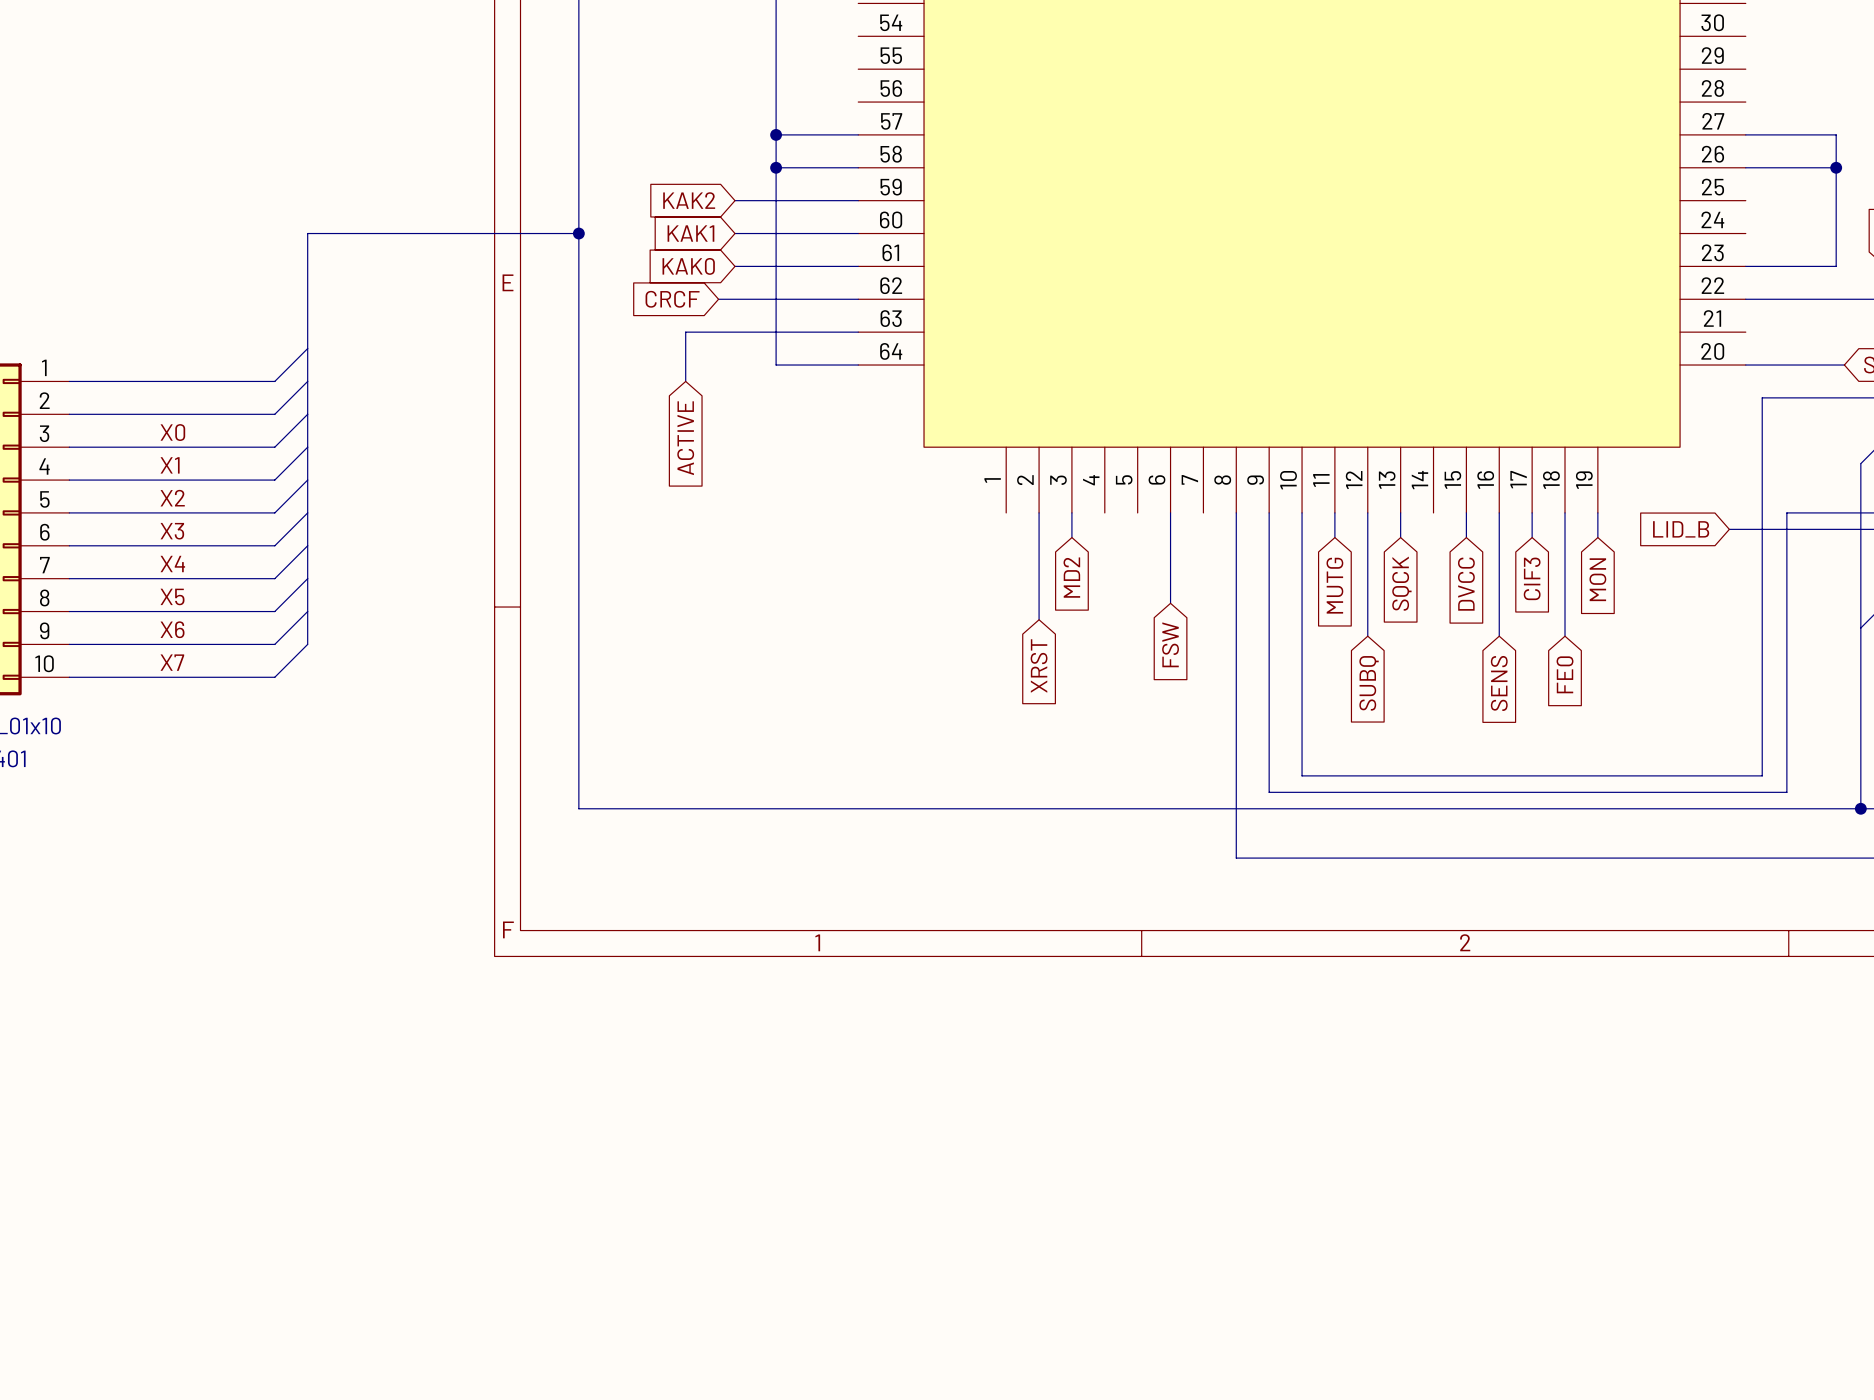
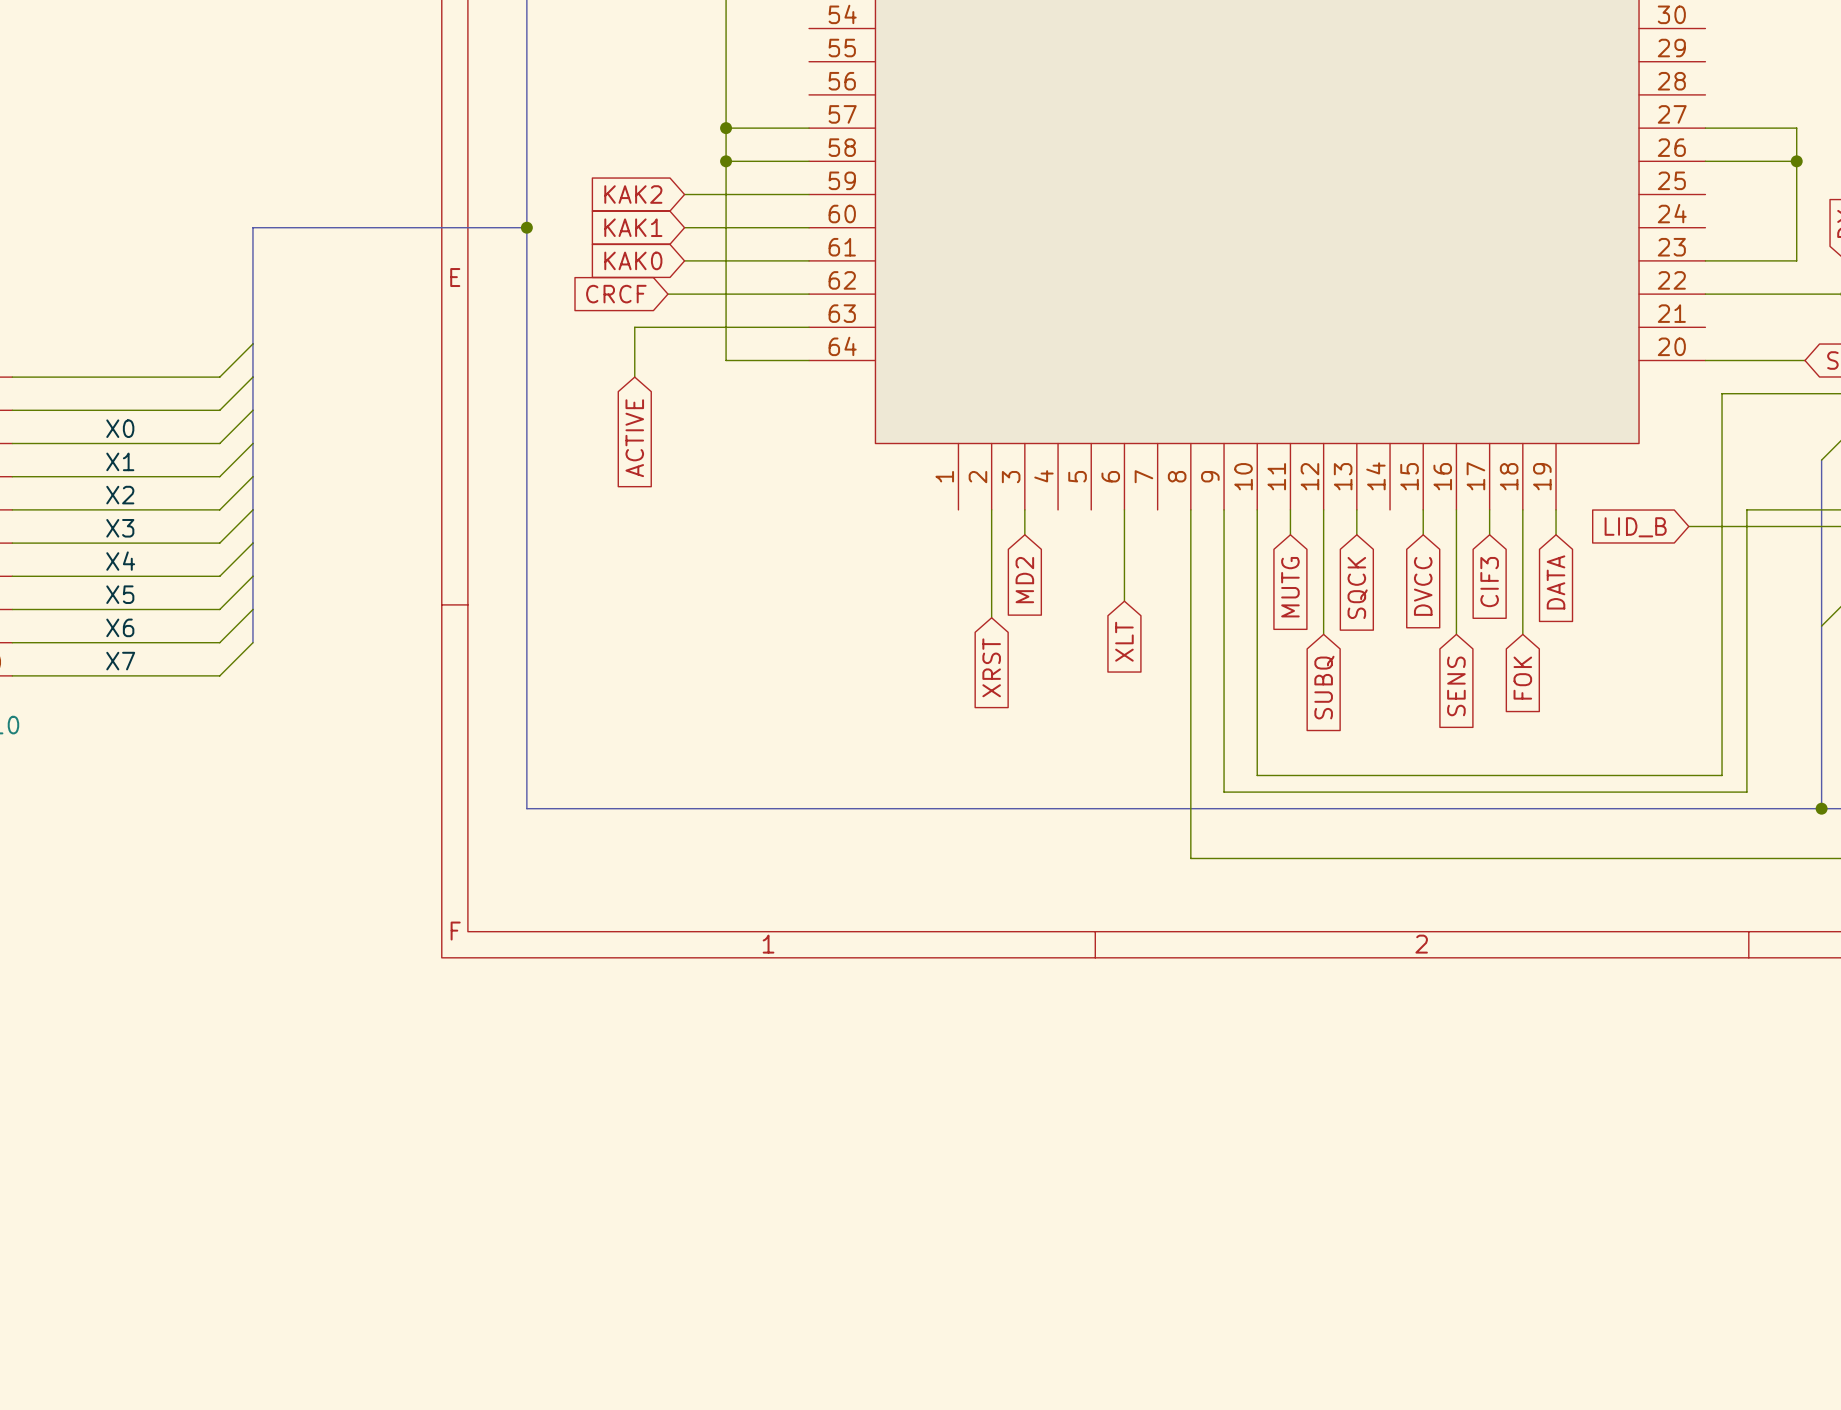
global label: MON (1597, 579) -> DATA (1556, 582)
global label: FSW (1170, 644) -> XLT (1124, 641)
global label: FE0 (1565, 674) -> FOK (1522, 678)

